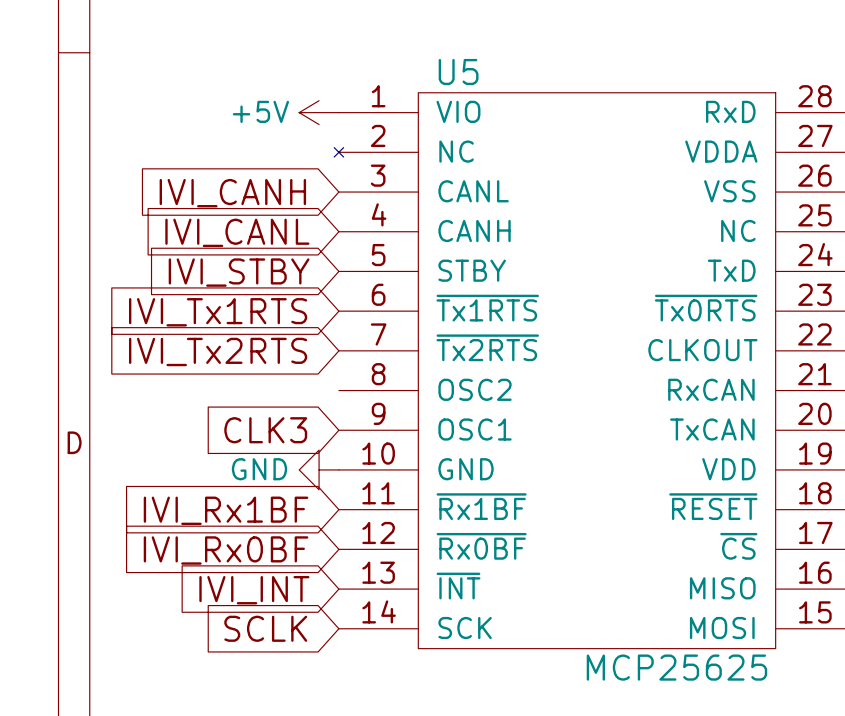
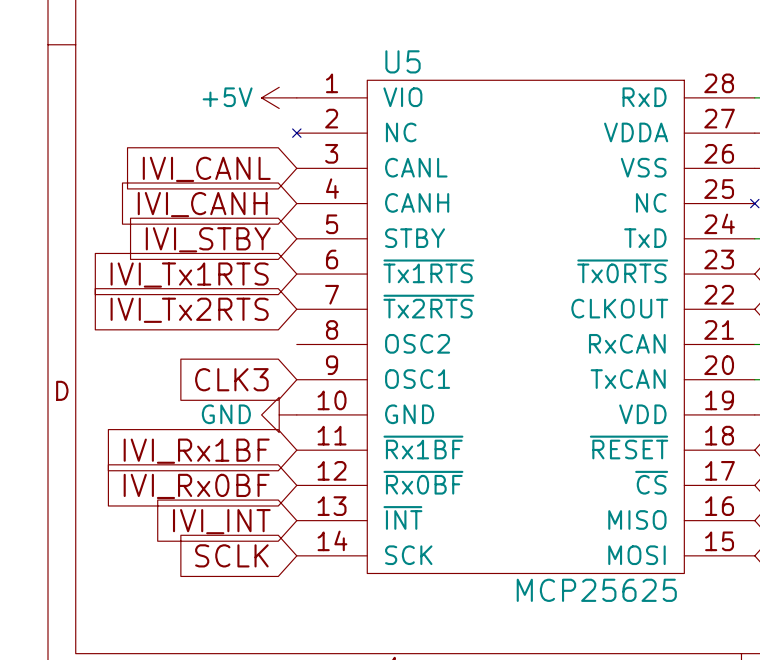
global label: IVI_CANH (232, 193) -> IVI_CANL (206, 169)
global label: IVI_CANL (237, 232) -> IVI_CANH (202, 204)

